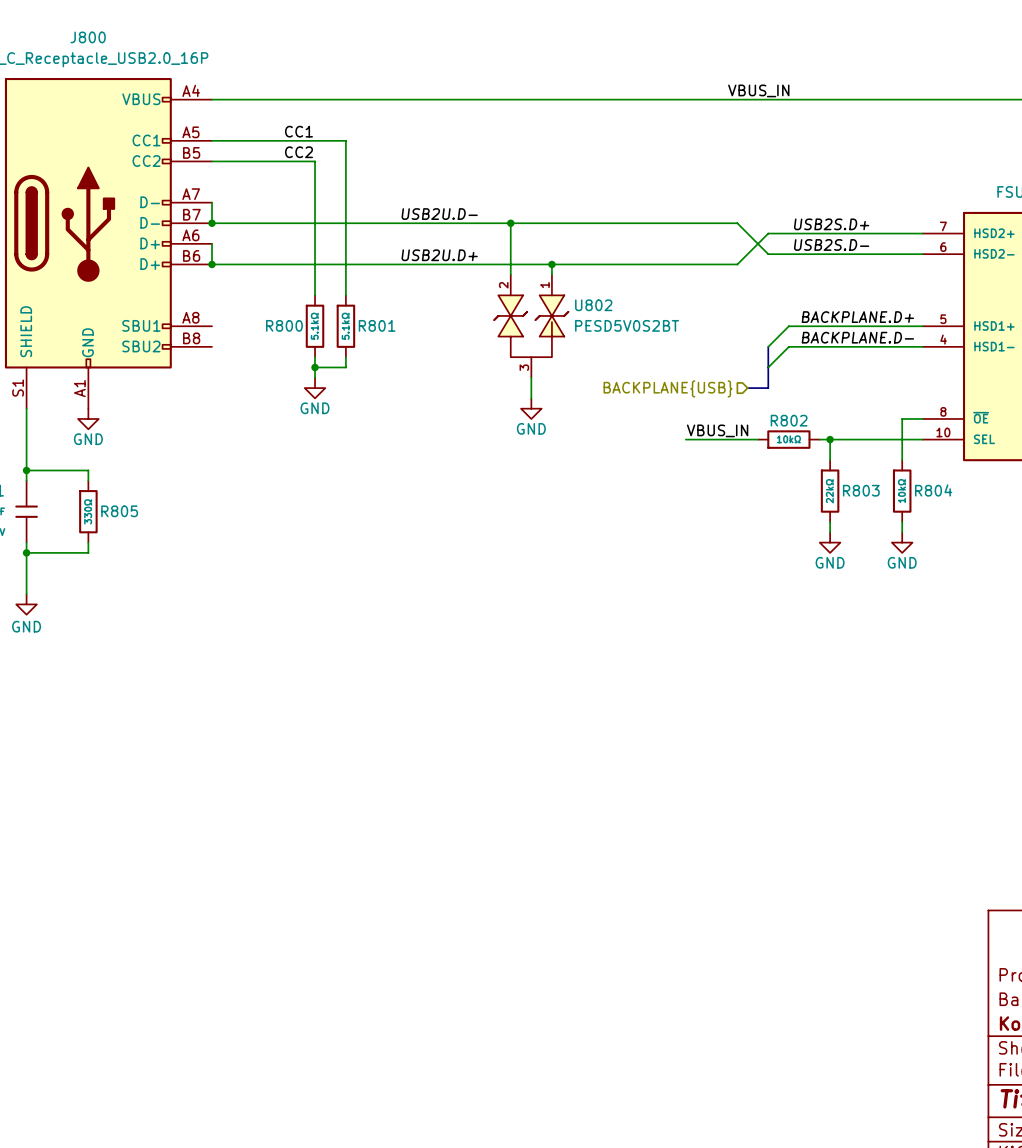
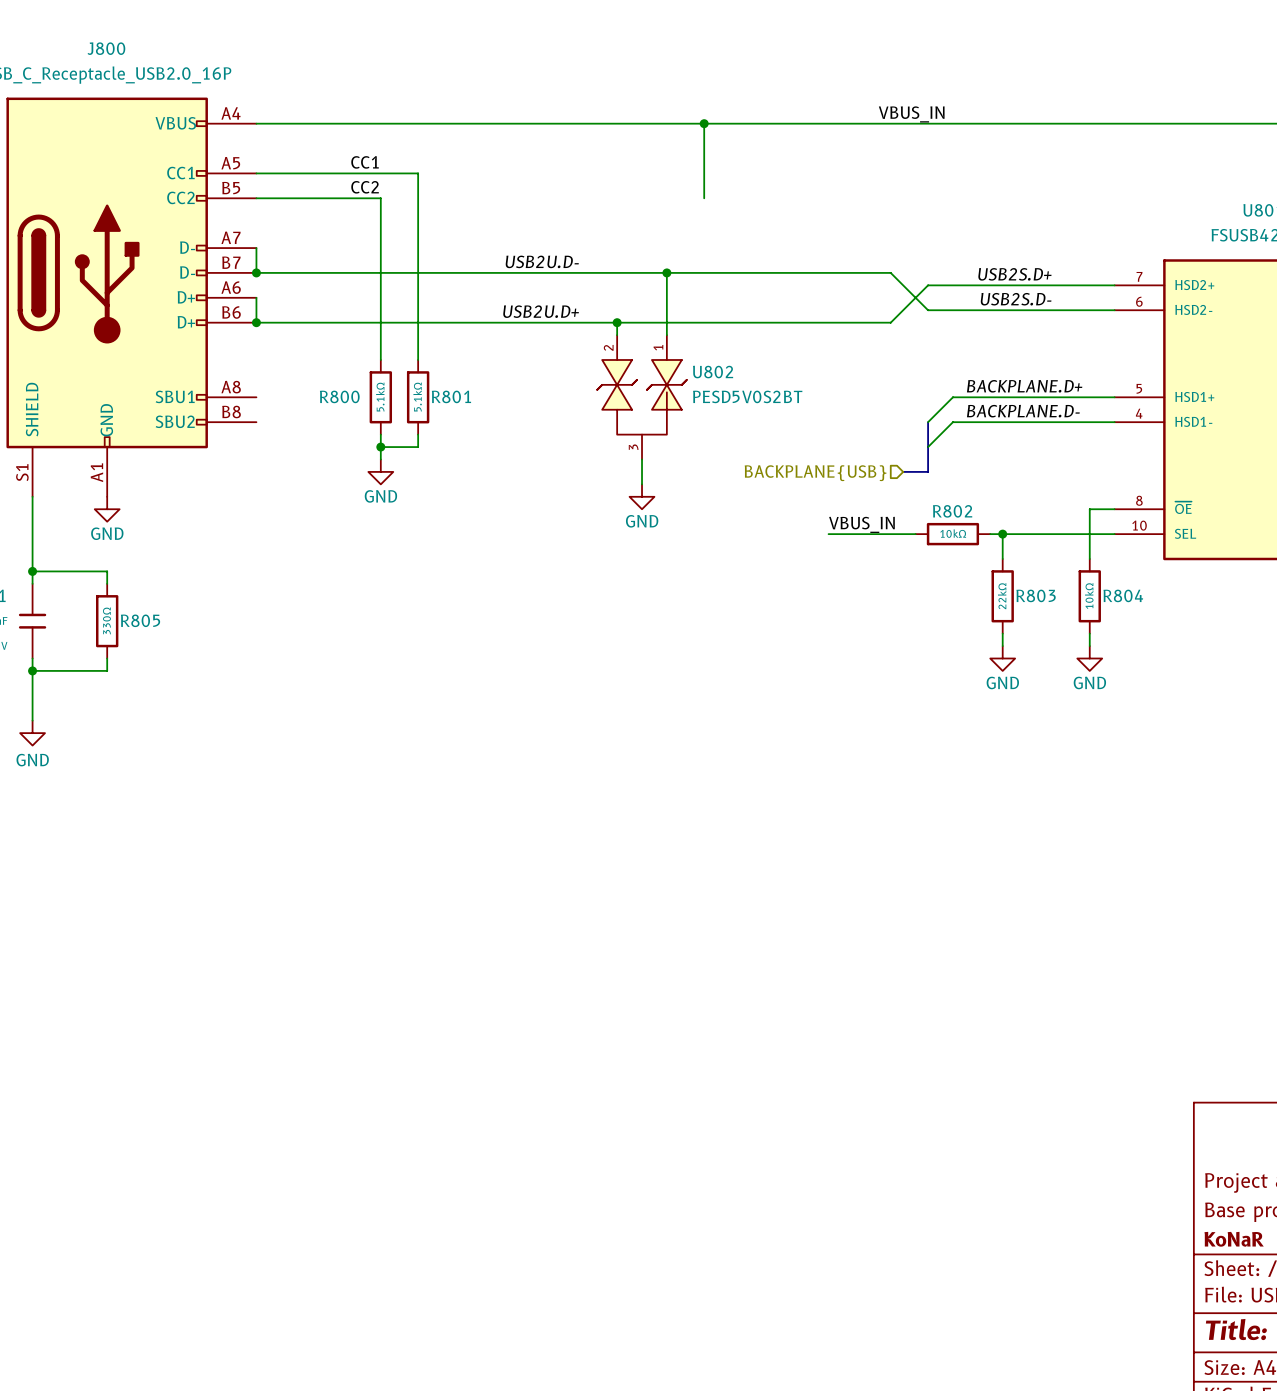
wire: none -> (704, 123) (704, 198)
junction: none -> (704, 123)
wire: (510, 223) (510, 264) -> (666, 272) (666, 322)
junction: (510, 223) -> none
junction: none -> (666, 272)
junction: none -> (617, 322)
junction: (551, 264) -> none

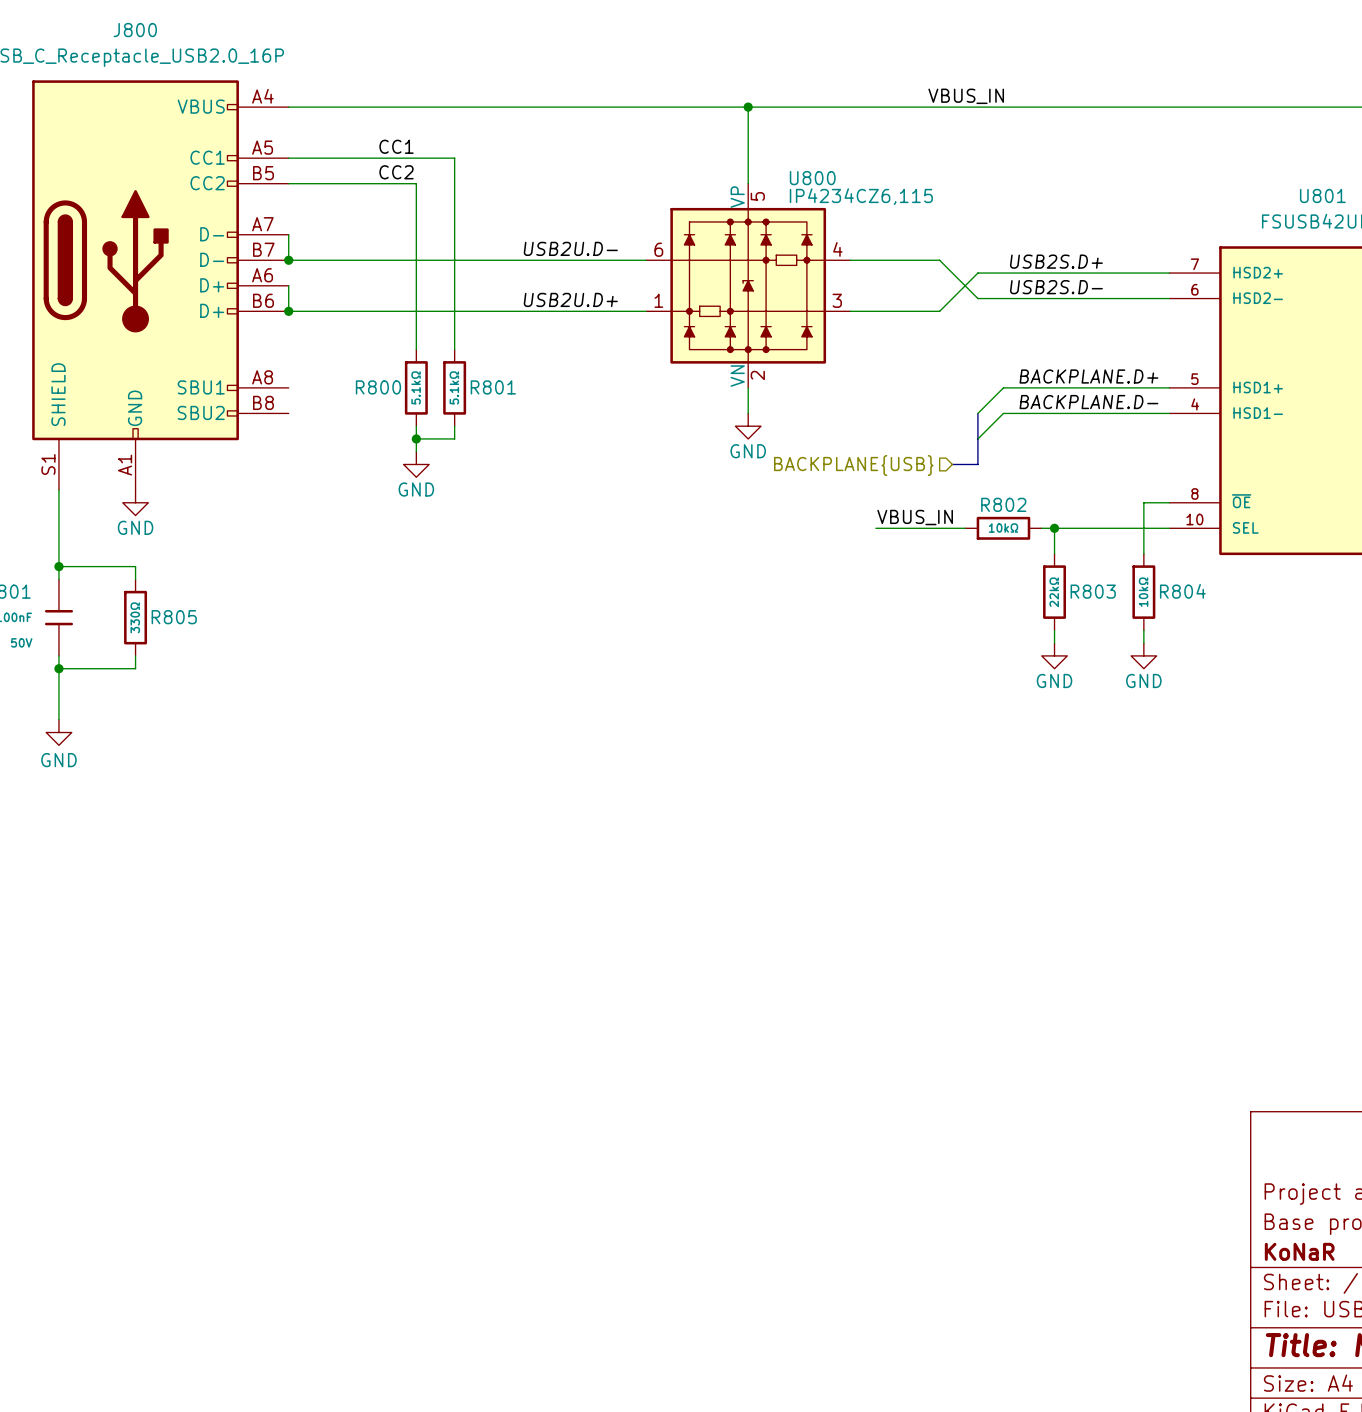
junction: (666, 272) -> none
U800: none -> IP4234CZ6,115 (748, 285)
wire: (617, 322) (617, 335) -> none
junction: (617, 322) -> none
U802: PESD5V0S2BT (642, 397) -> none
wire: (642, 459) (642, 484) -> (748, 387) (748, 413)
power symbol position: GND (642, 496) -> GND (748, 426)

